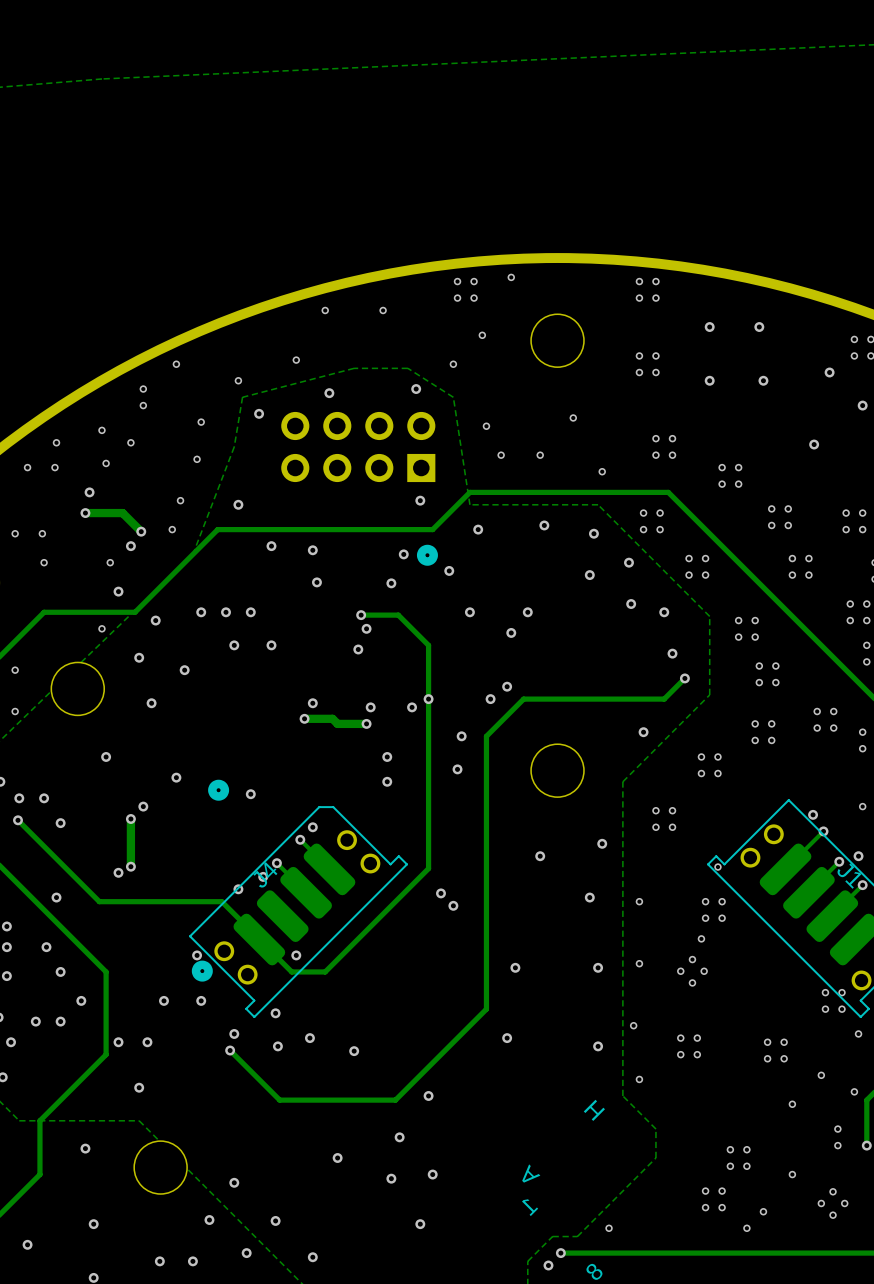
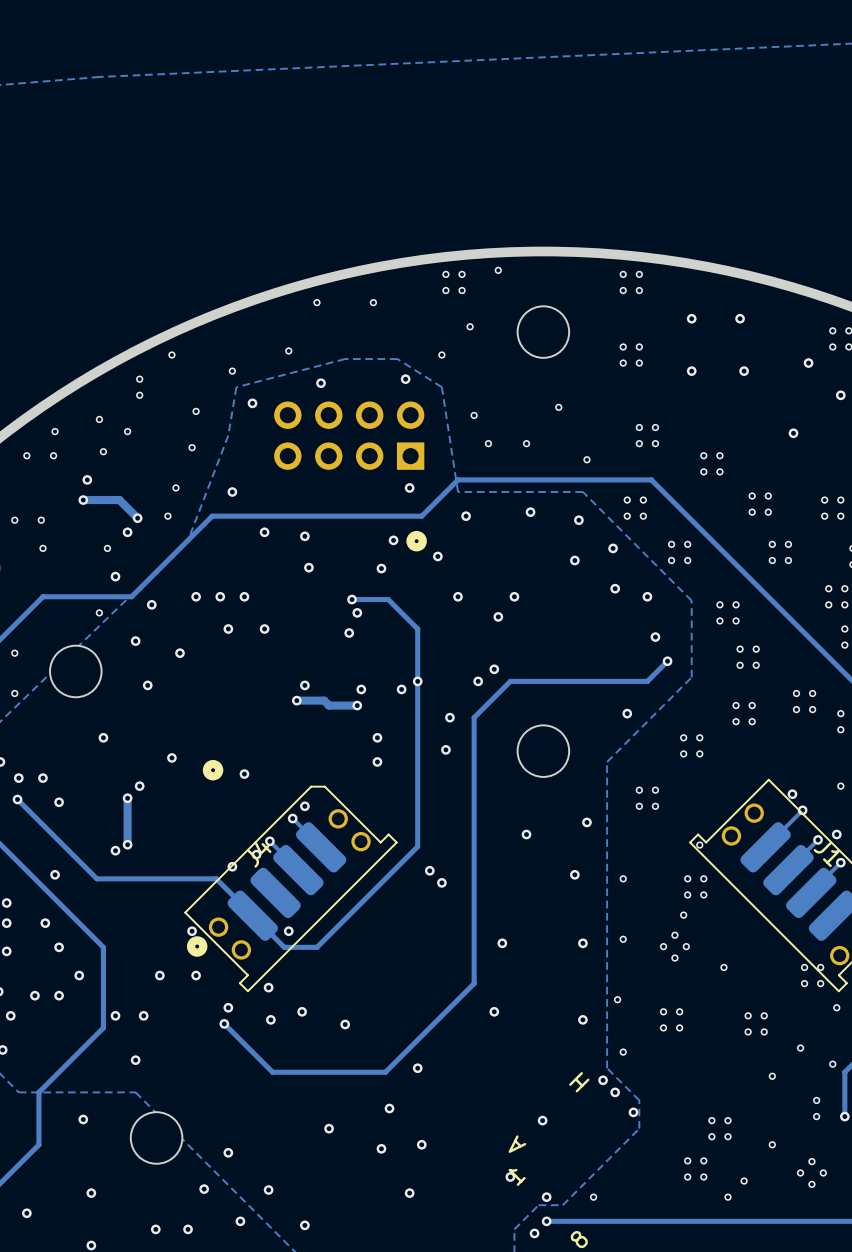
via: none -> (723, 967)
via: none -> (603, 1080)
via: none -> (615, 1092)
via: none -> (633, 1112)
via: none -> (542, 1120)
via: none -> (510, 1177)
via: none -> (546, 1197)

